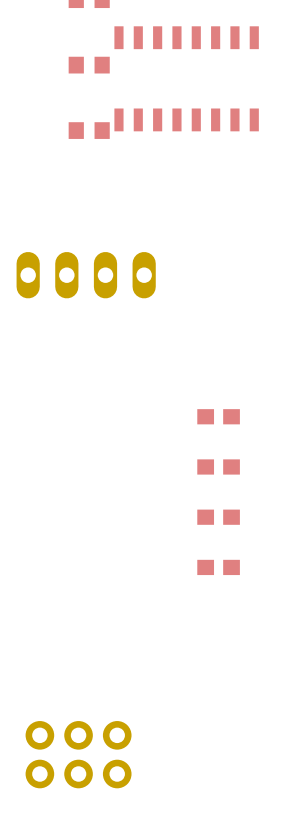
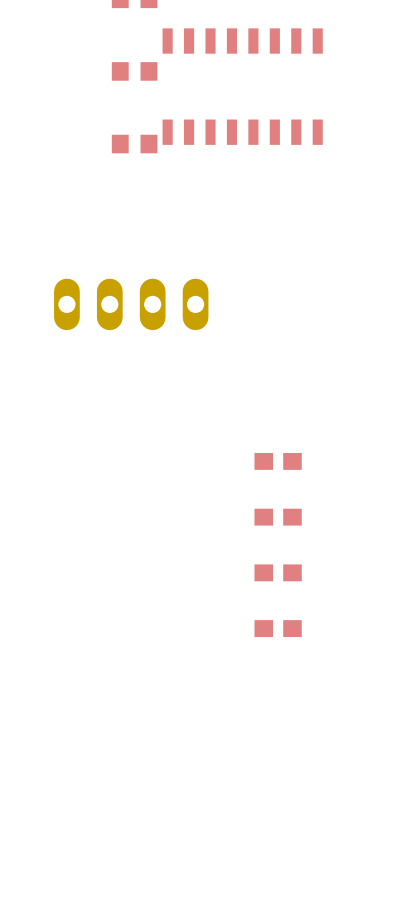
part: (78, 754) -> none

